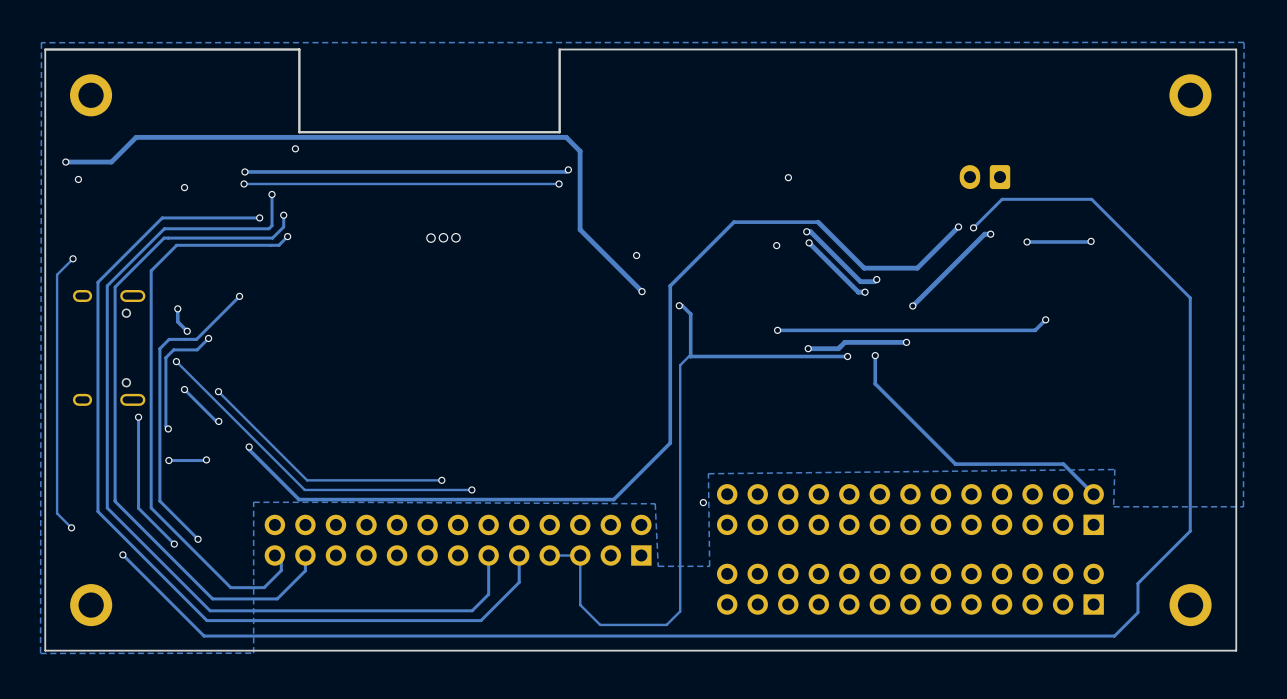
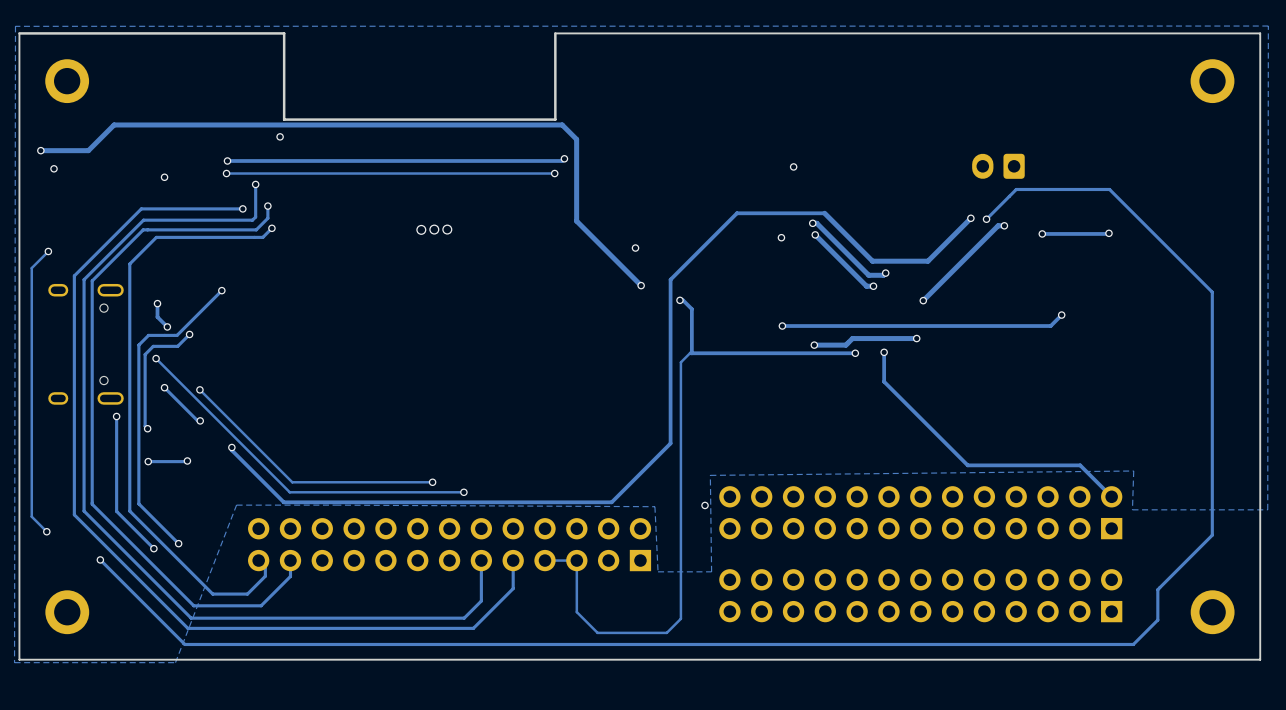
zone outline: (253, 502) (253, 653) (40, 653) -> (236, 505) (175, 662) (14, 662)

